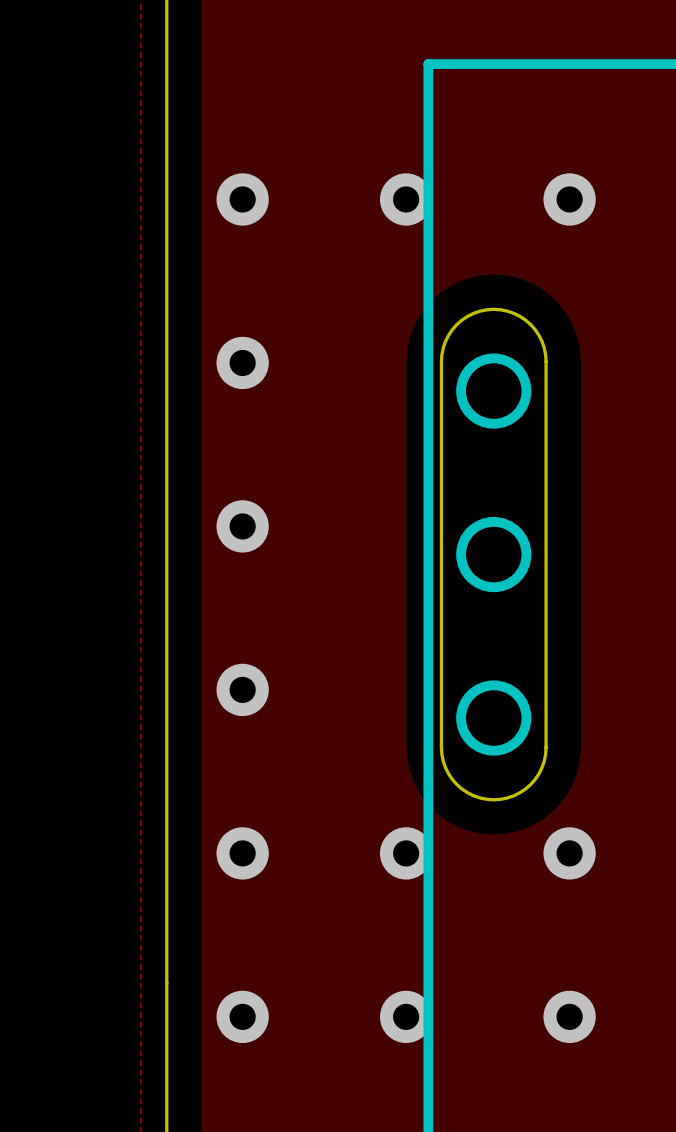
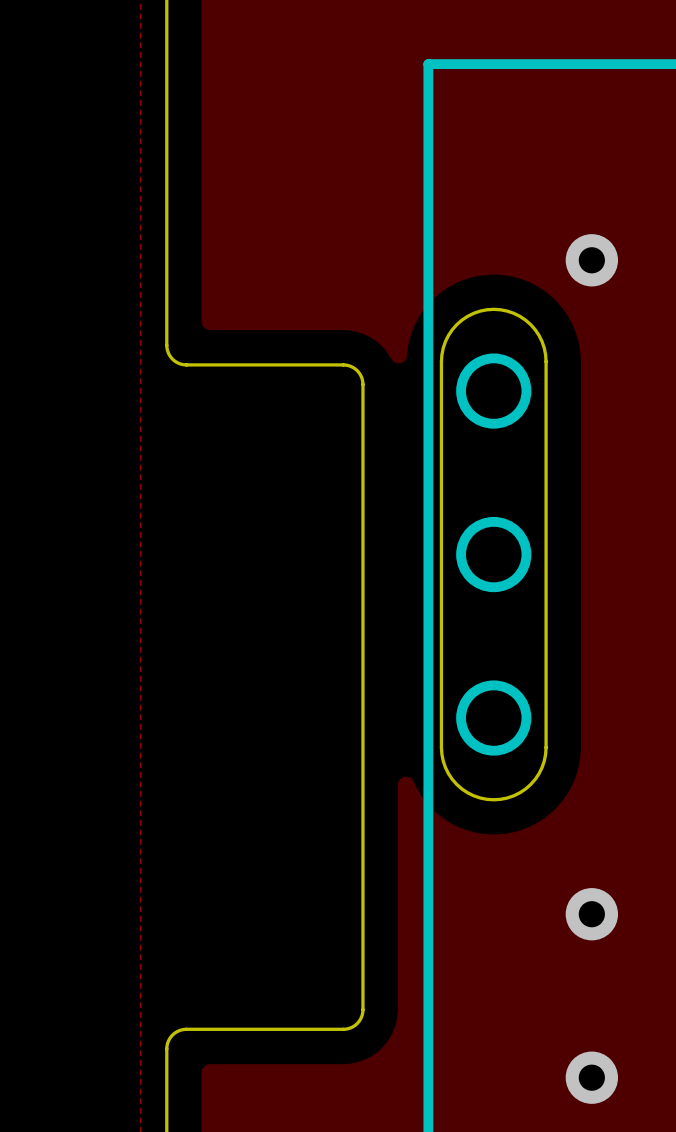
via: (242, 199) -> none
via: (406, 199) -> none
via position: (569, 199) -> (591, 260)
board edge: (166, 345) (166, 1048) -> (166, 345) (170, 357) (181, 364) (345, 365) (358, 372) (362, 384) (362, 1014) (357, 1023) (345, 1029) (183, 1029) (172, 1035) (166, 1048)
via: (242, 362) -> none
via: (242, 526) -> none
via: (242, 689) -> none
via: (242, 853) -> none
via: (406, 853) -> none
via: (569, 853) -> none
via: none -> (591, 914)
via: (242, 1016) -> none
via: (406, 1016) -> none
via: (569, 1016) -> none
via: none -> (591, 1077)

